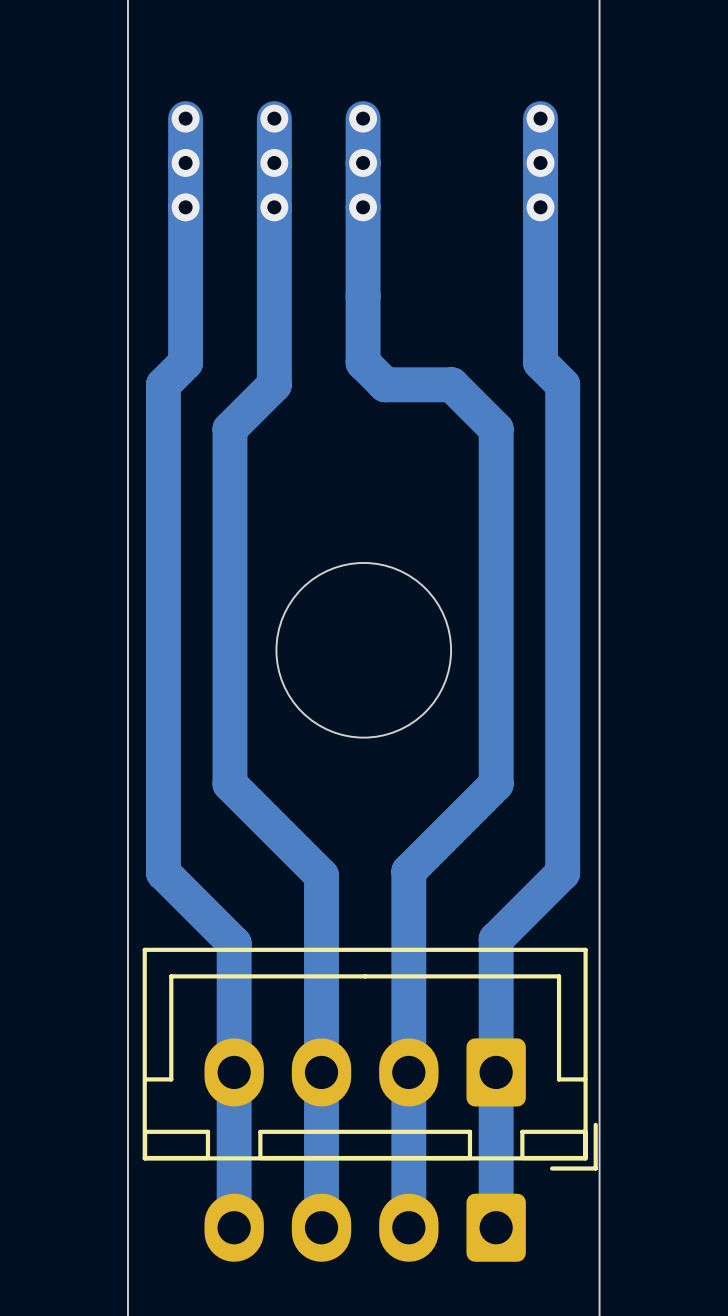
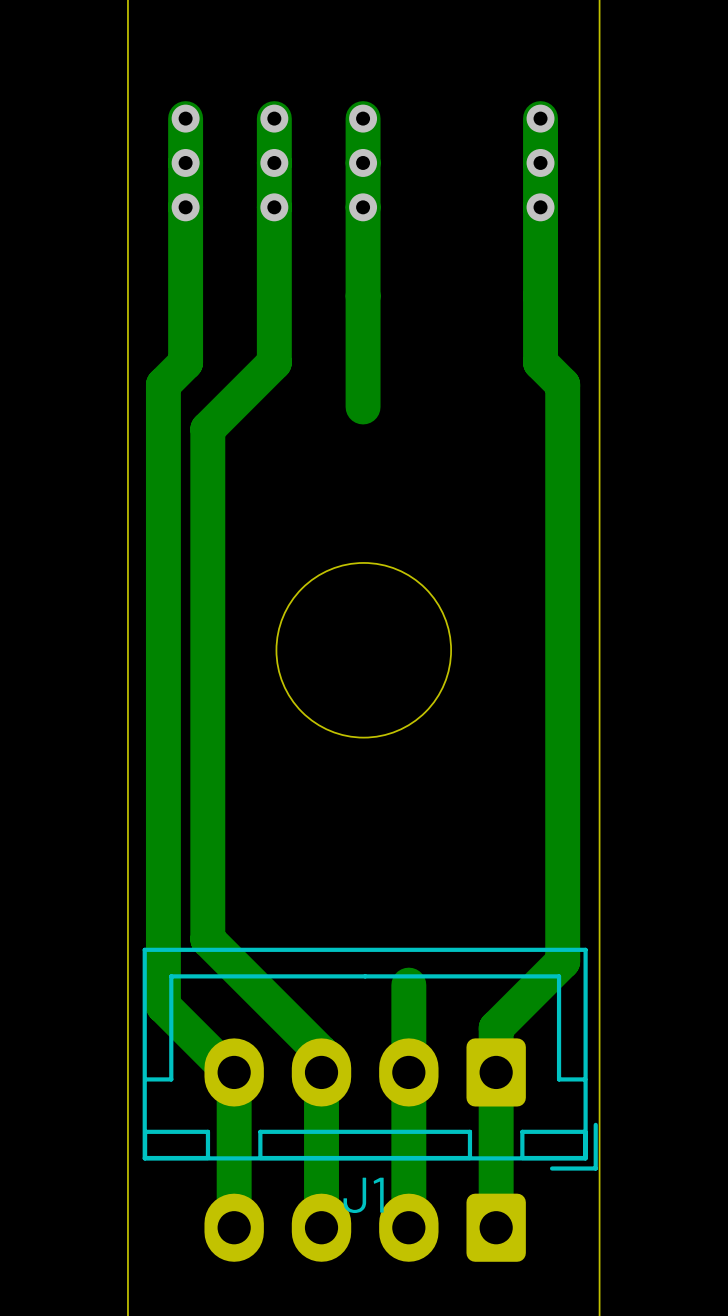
track: (274, 362) (274, 384) (229, 429) (229, 784) (321, 875) (321, 1053) -> (274, 362) (207, 429) (207, 939) (321, 1053)
track: (363, 362) (385, 384) (451, 384) (496, 429) (496, 784) (408, 871) (408, 985) -> (363, 362) (363, 406)
track: (163, 872) (234, 943) (234, 1072) -> (163, 872) (163, 1005) (229, 1072) (234, 1072)
track: (562, 872) (496, 939) (496, 1028) -> (562, 872) (562, 961) (496, 1028)
J1 name: none -> J1 (363, 1195)

